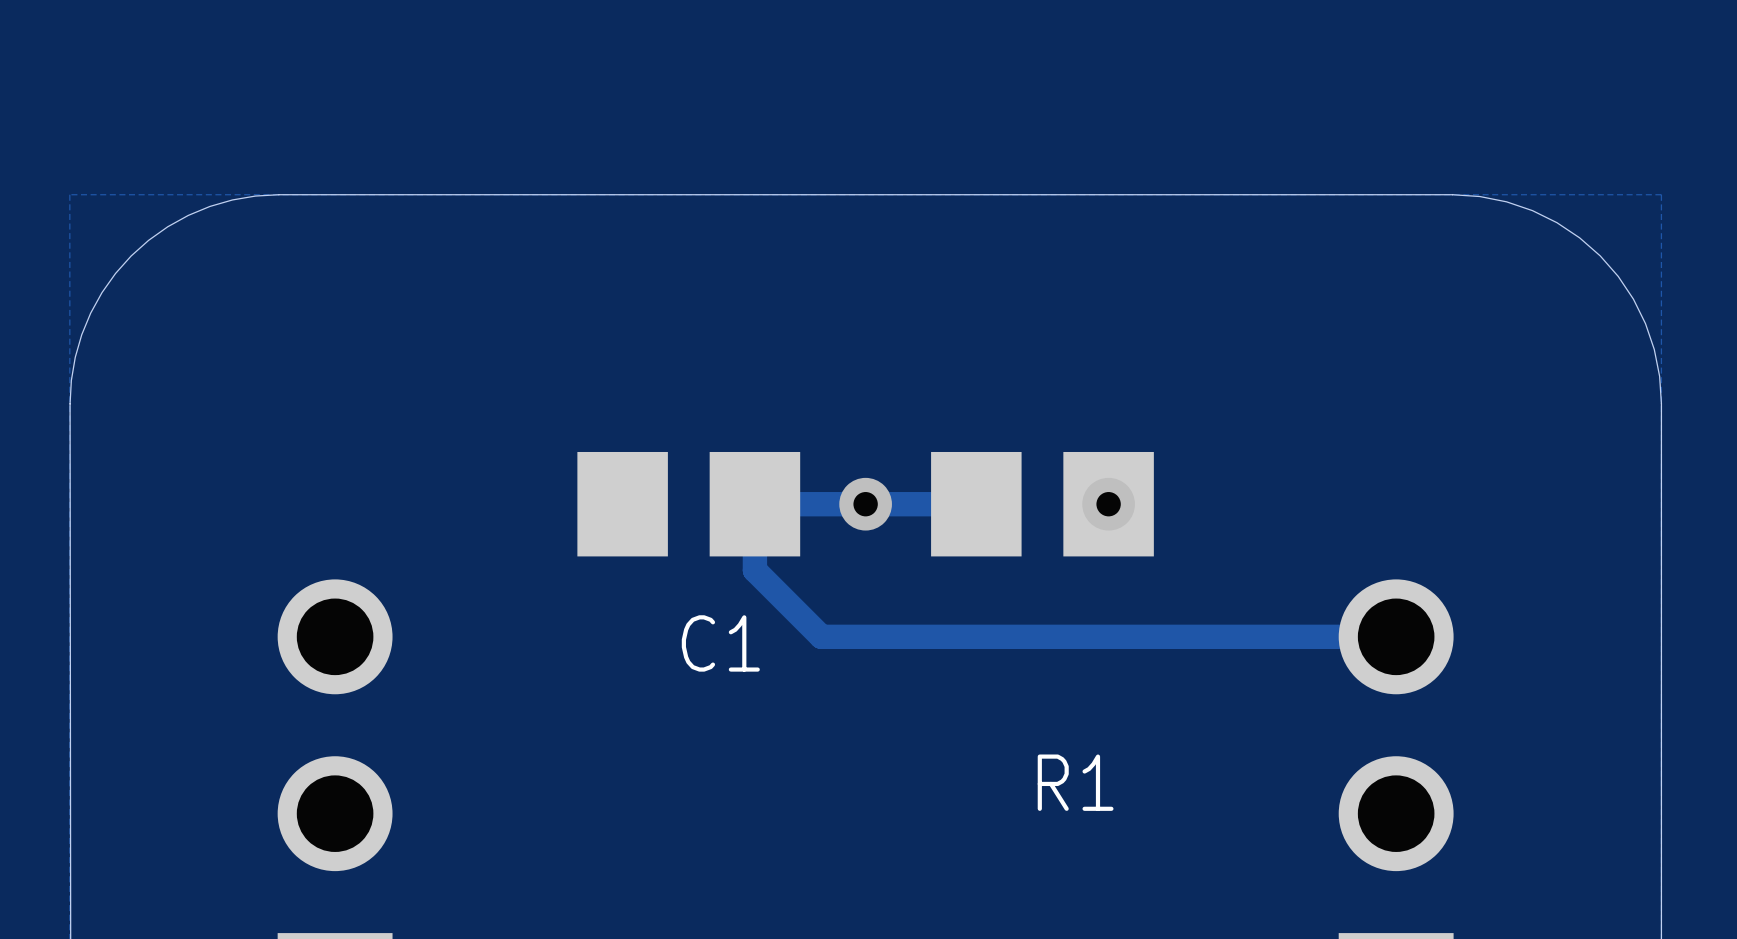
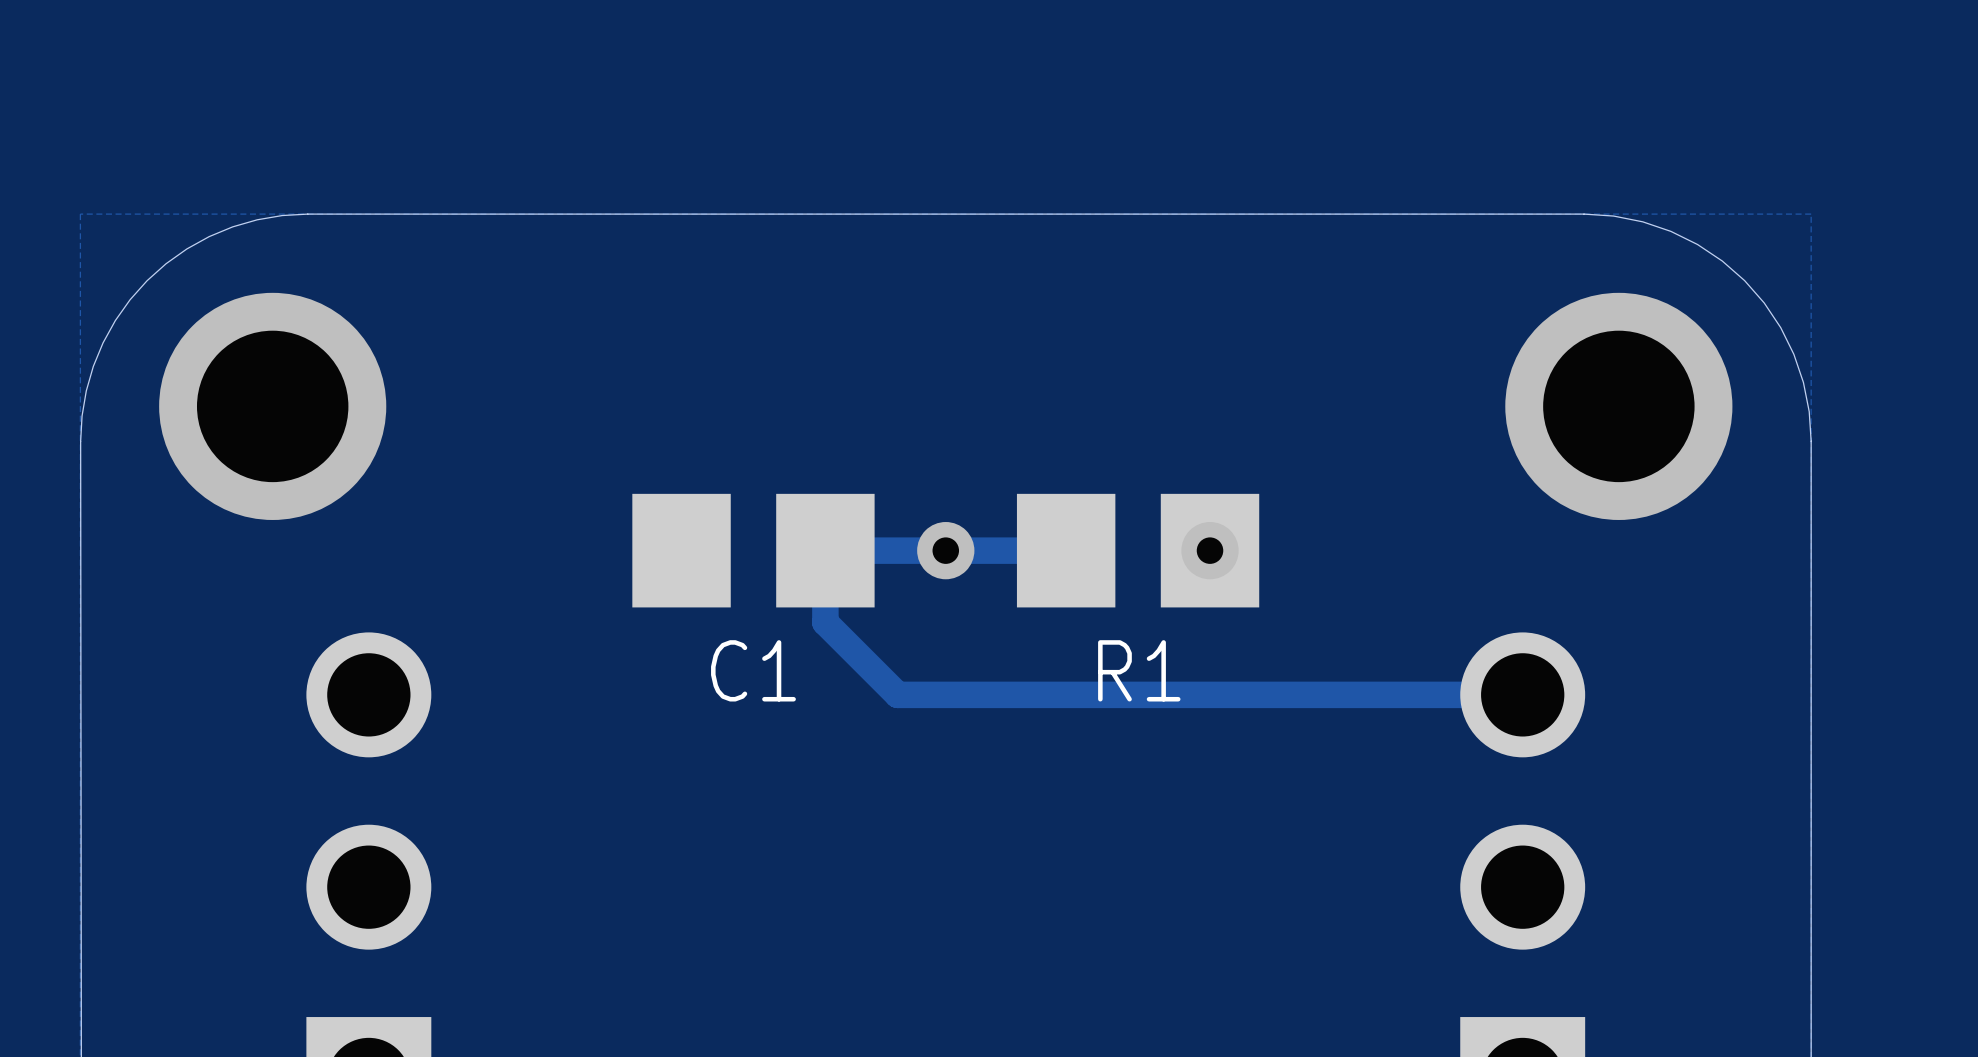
via: none -> (272, 406)
via: none -> (1618, 406)
C1 name position: C1 (720, 643) -> C1 (753, 670)
R1 name position: R1 (1075, 782) -> R1 (1139, 670)

